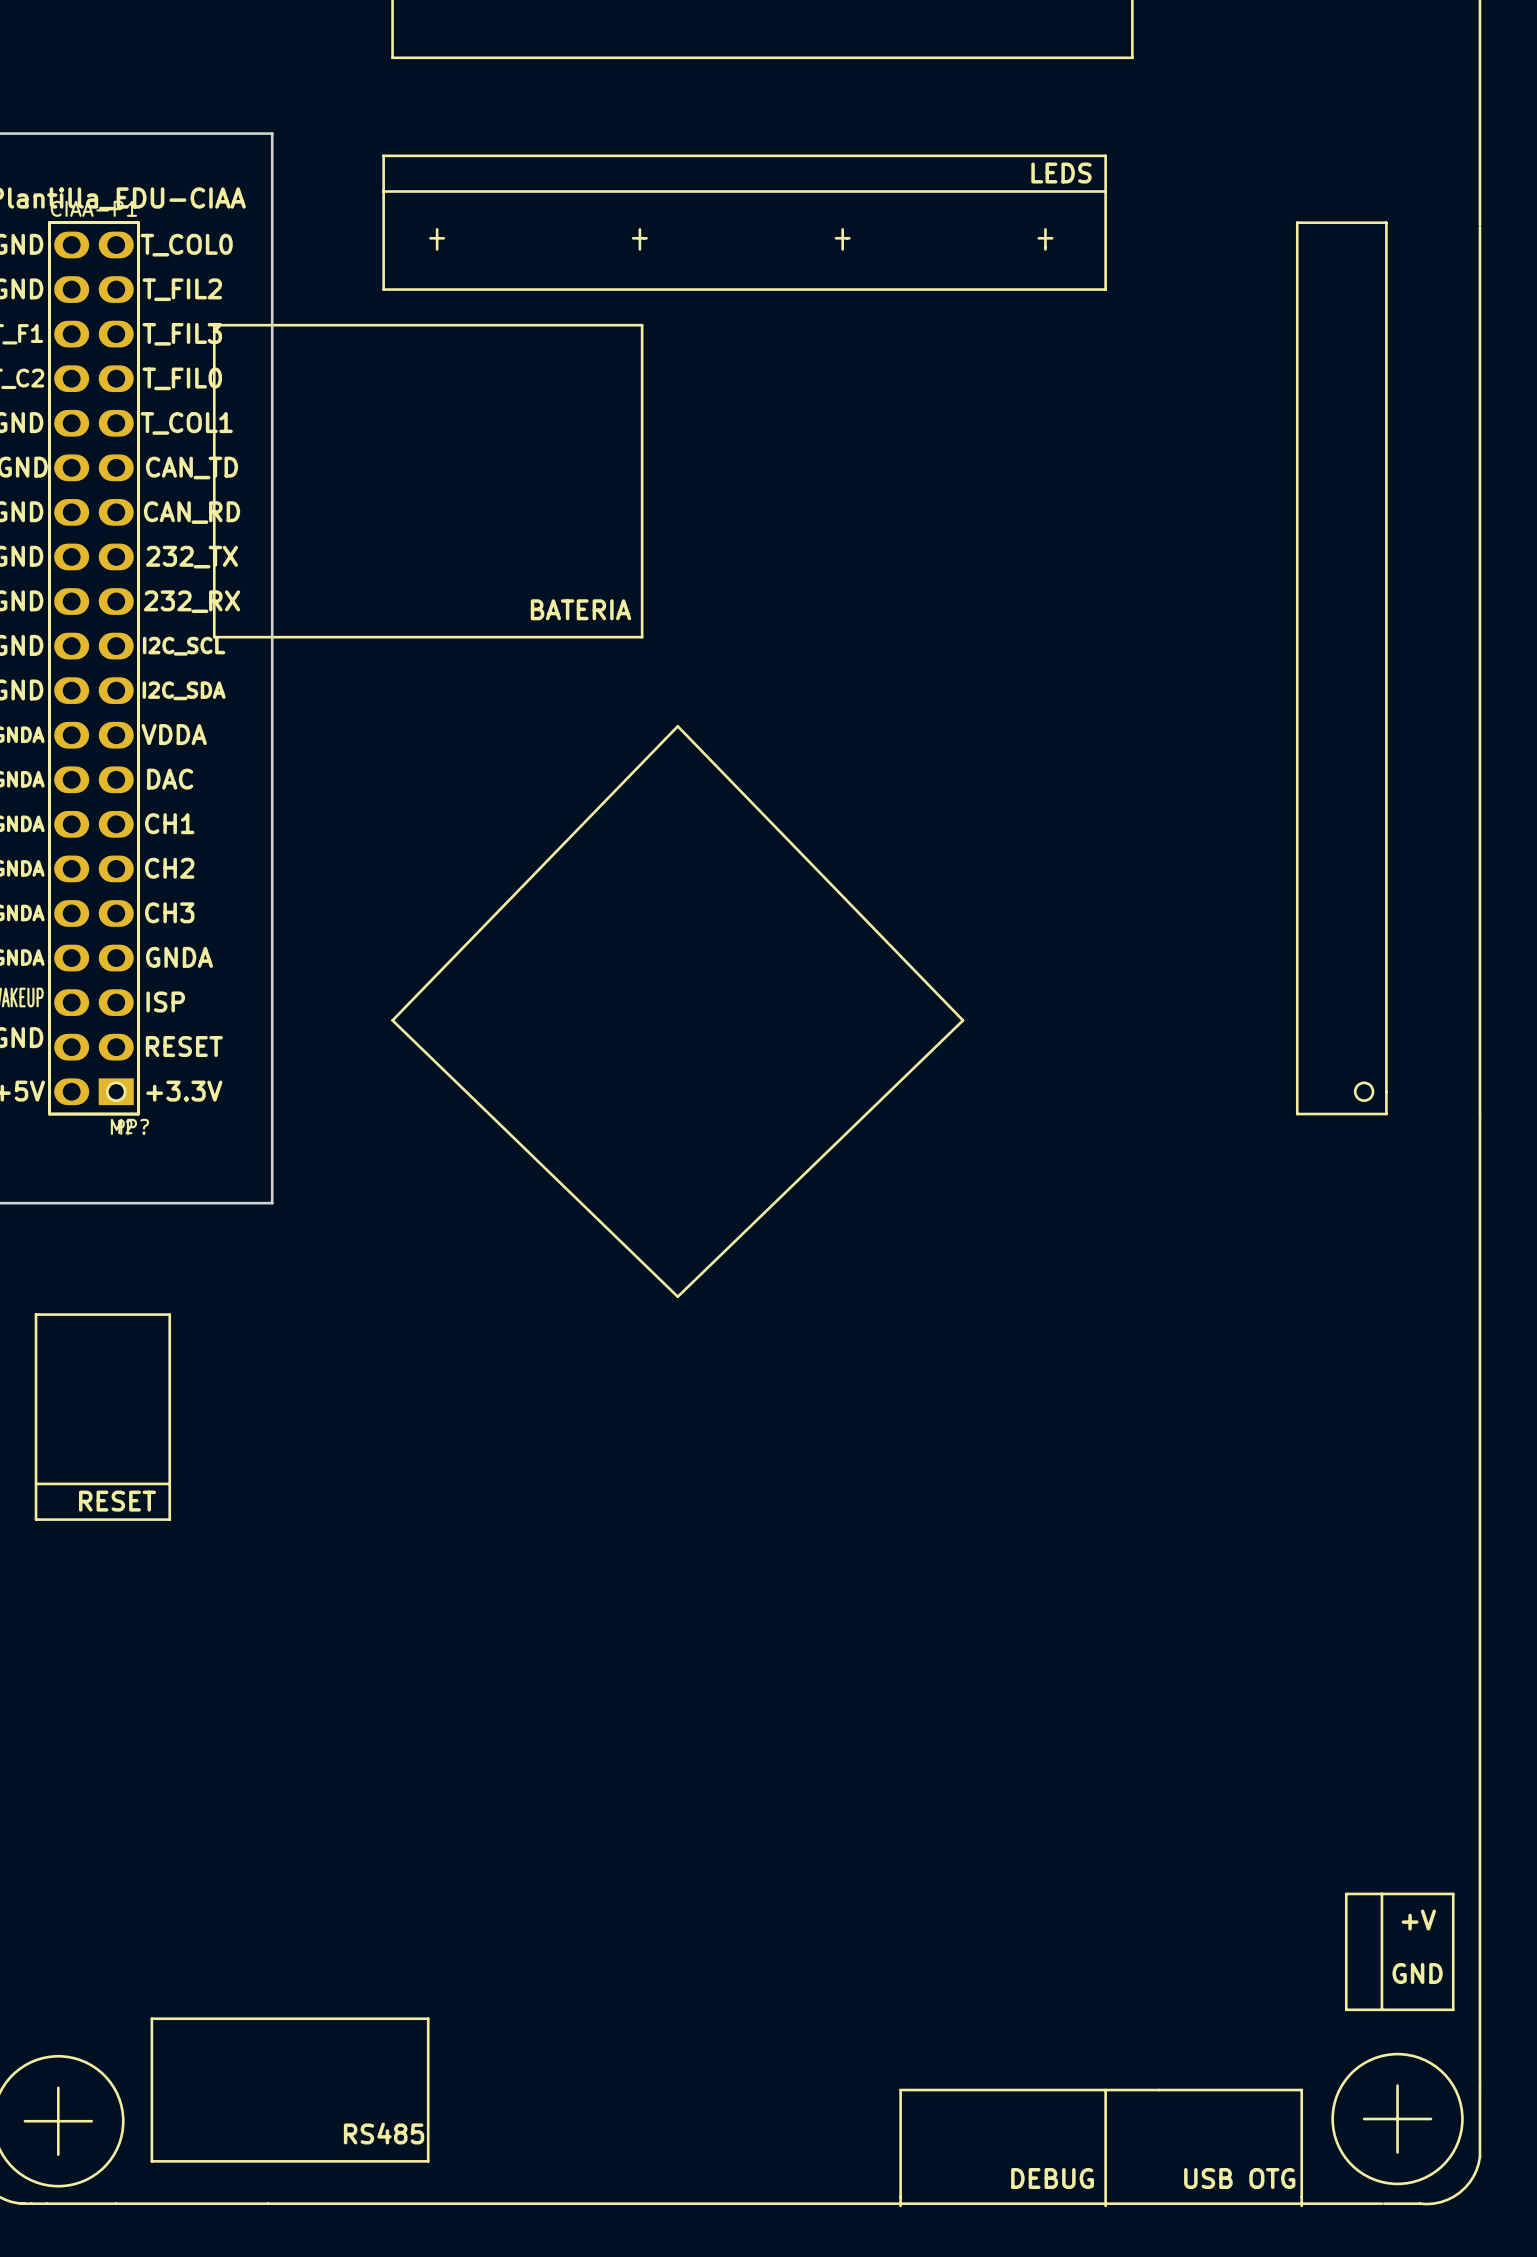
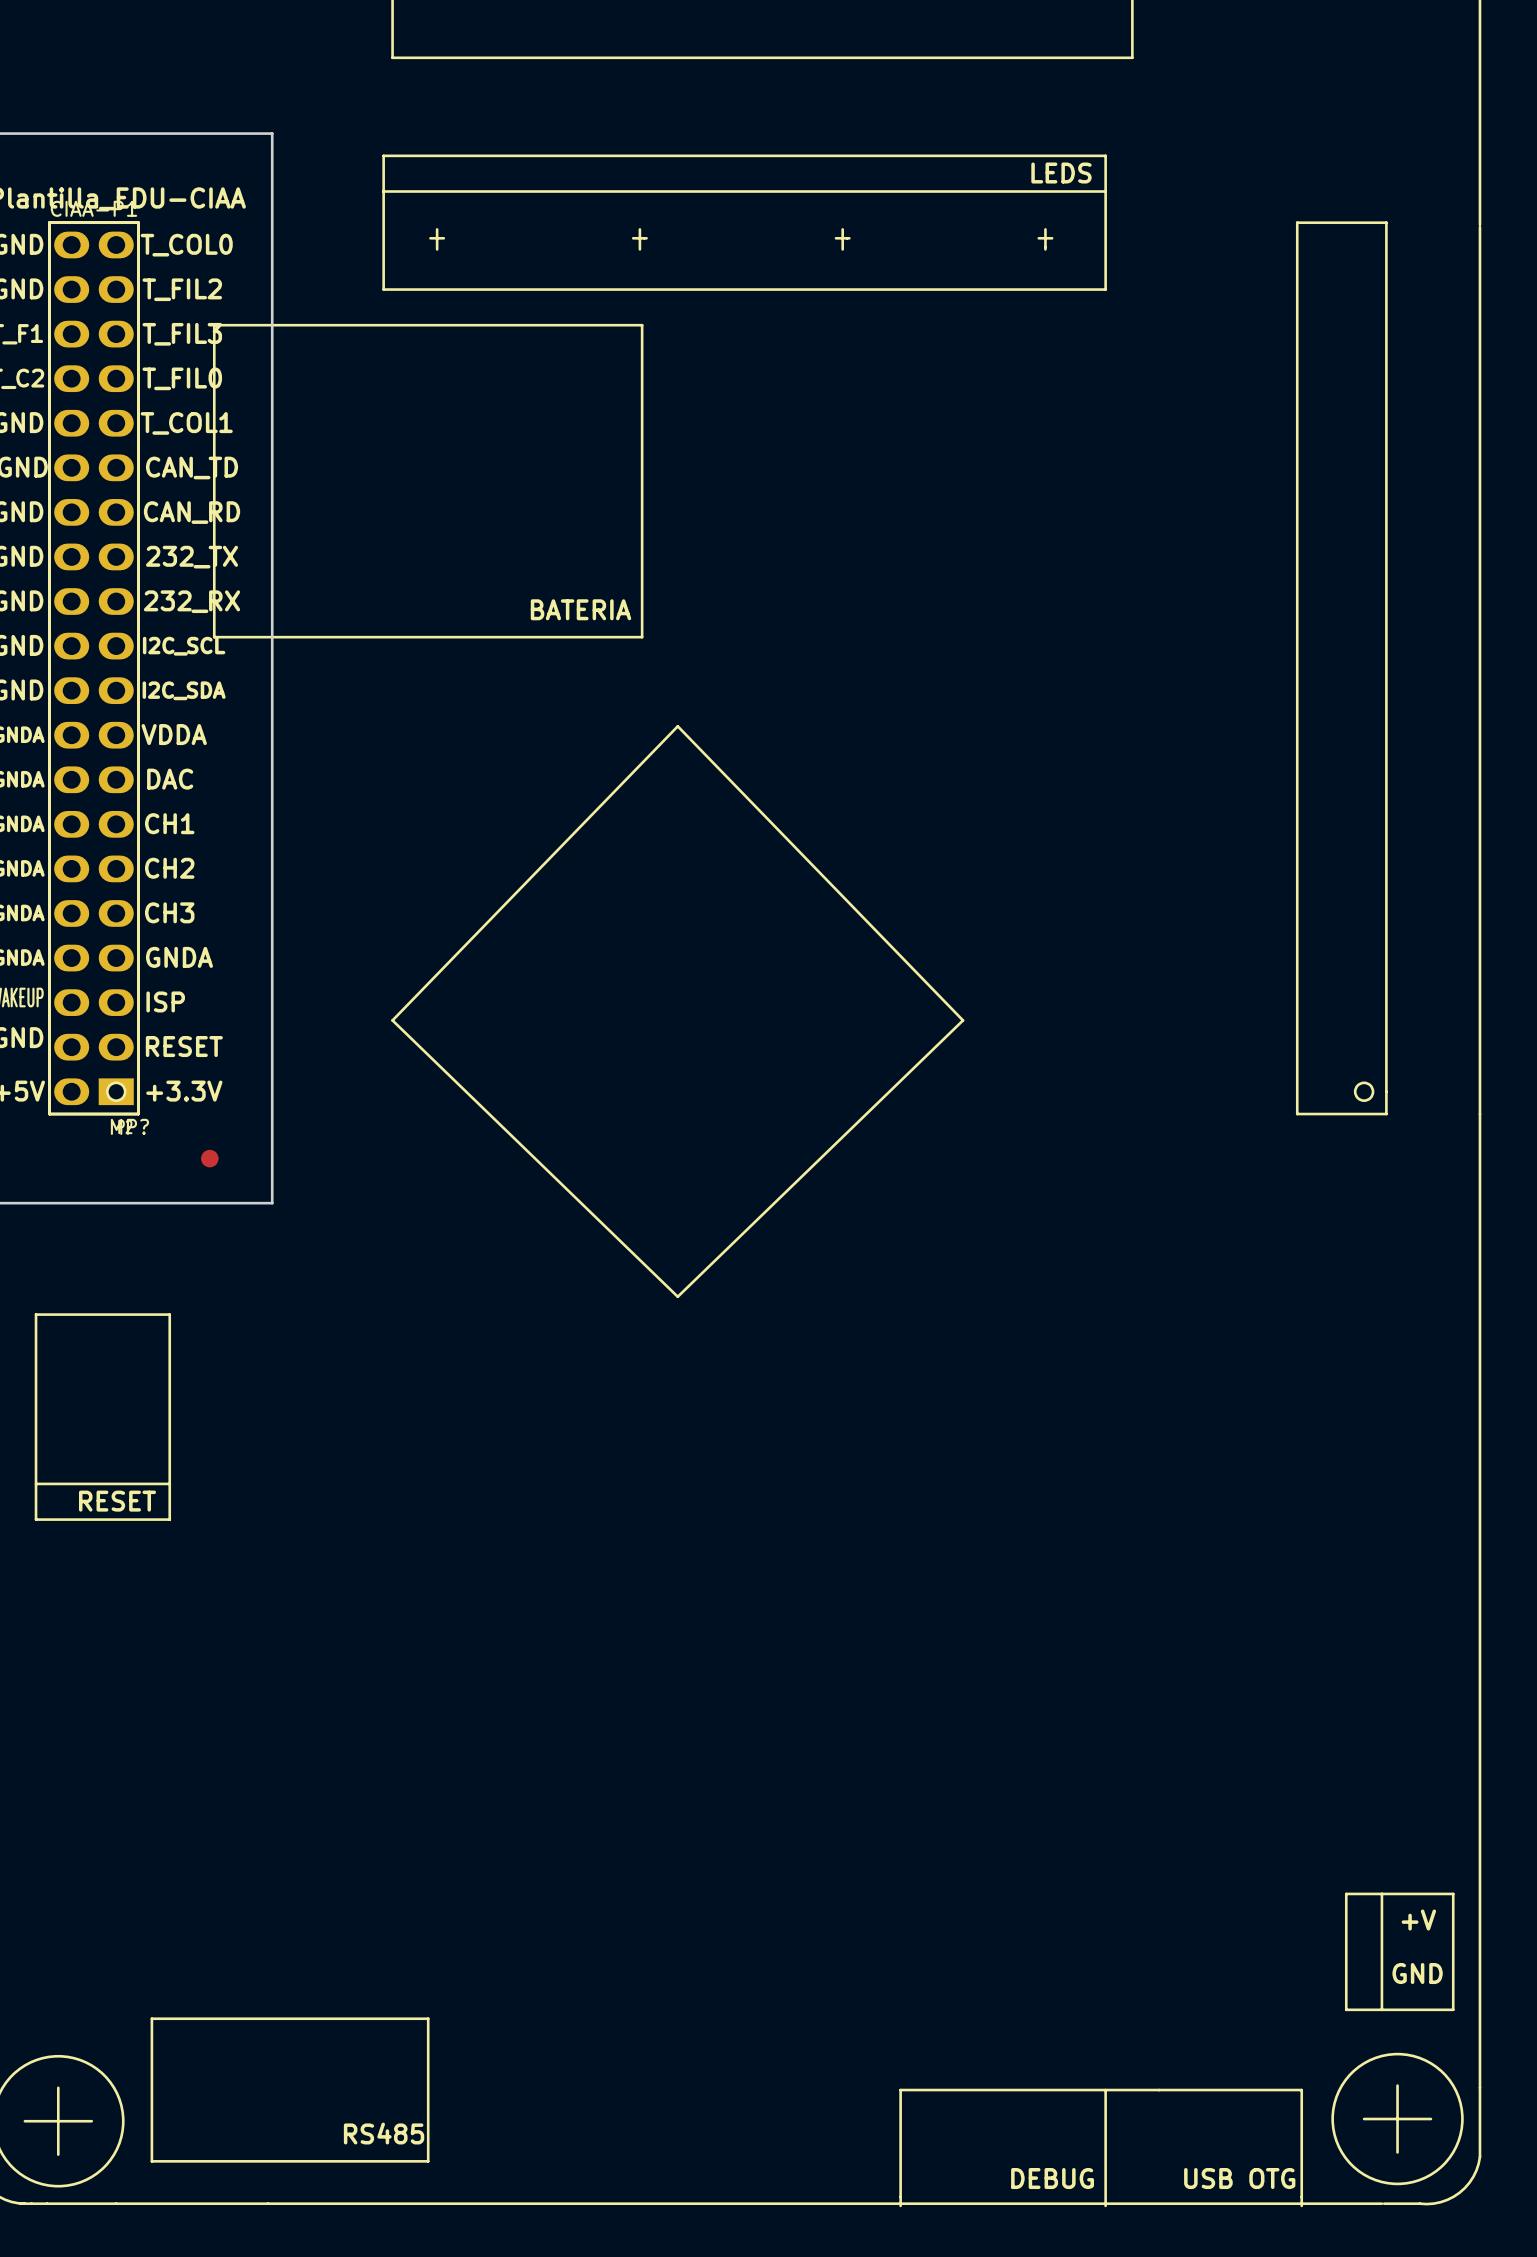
part: none -> (209, 1158)

